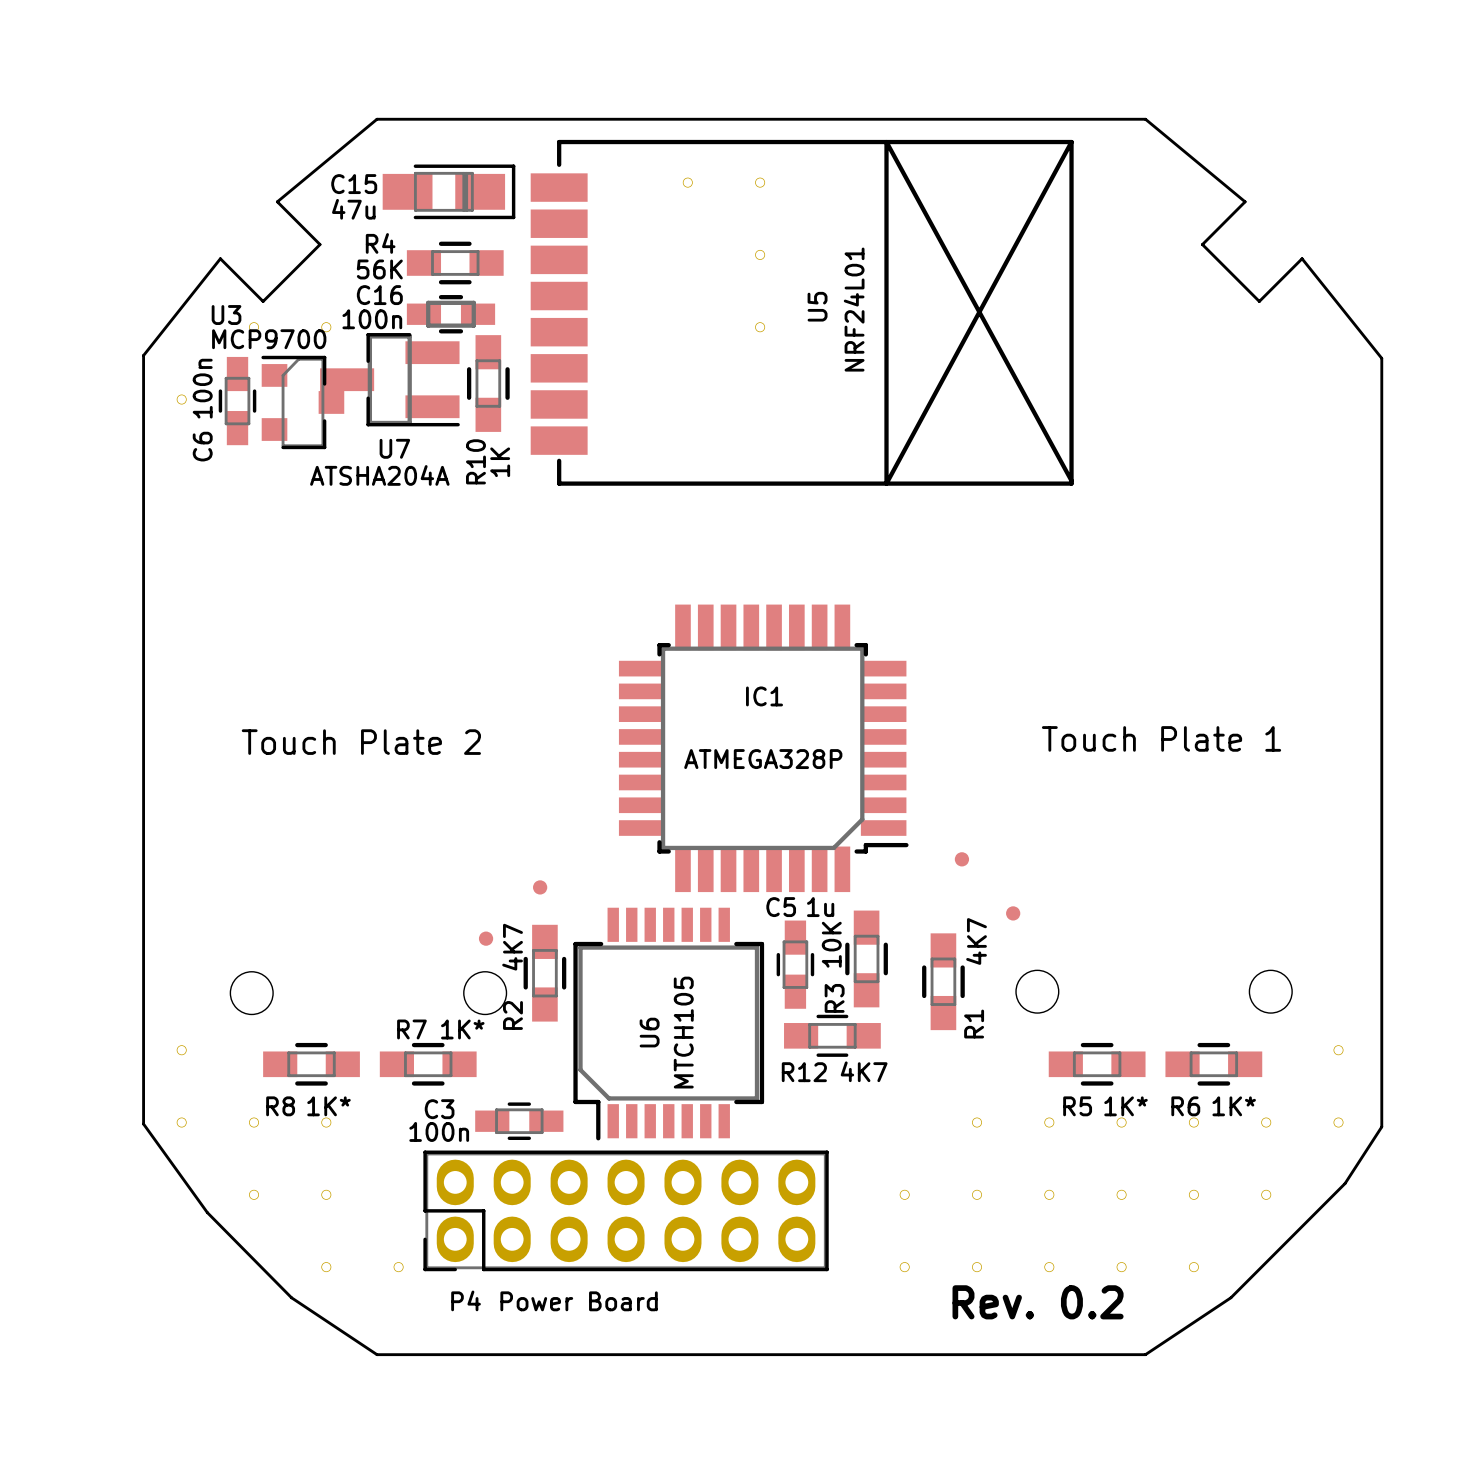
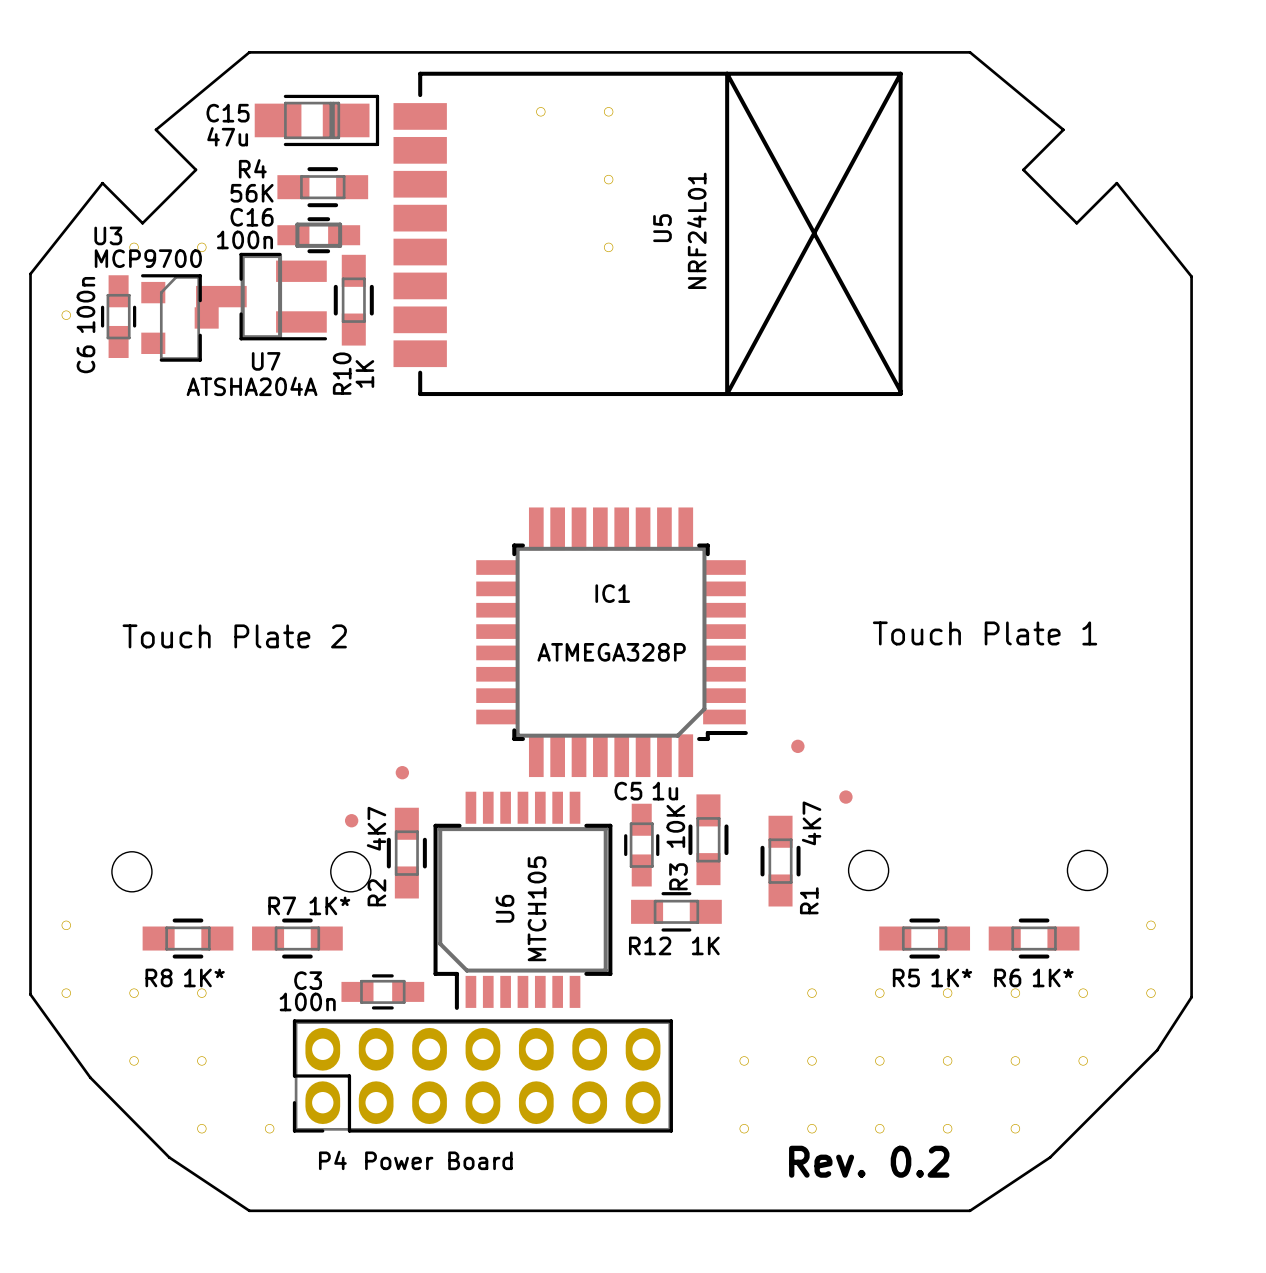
R12 value: 4K7 (864, 1071) -> 1K (705, 945)

